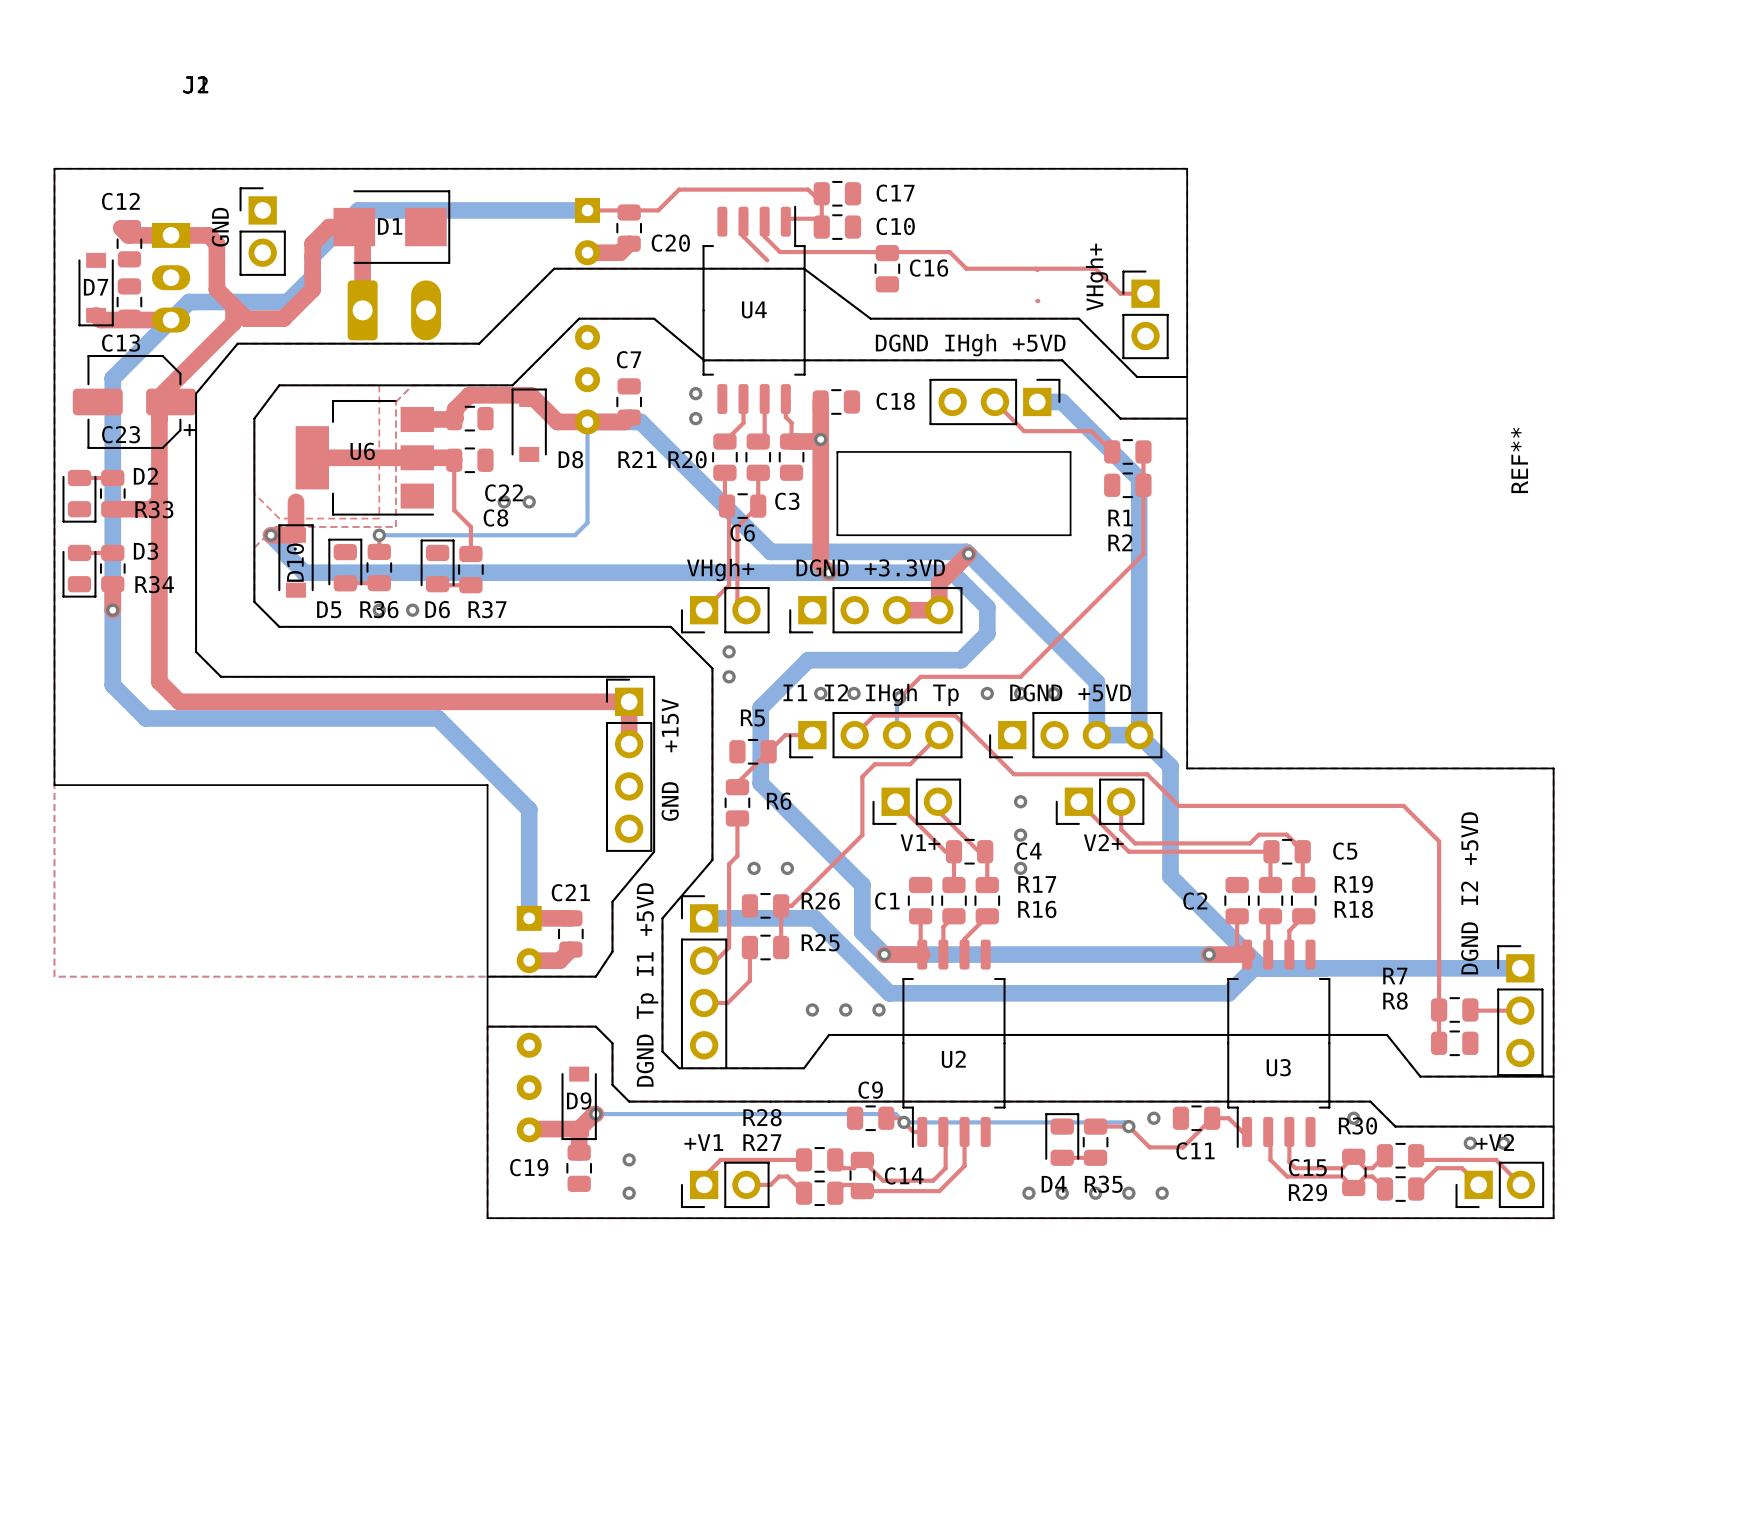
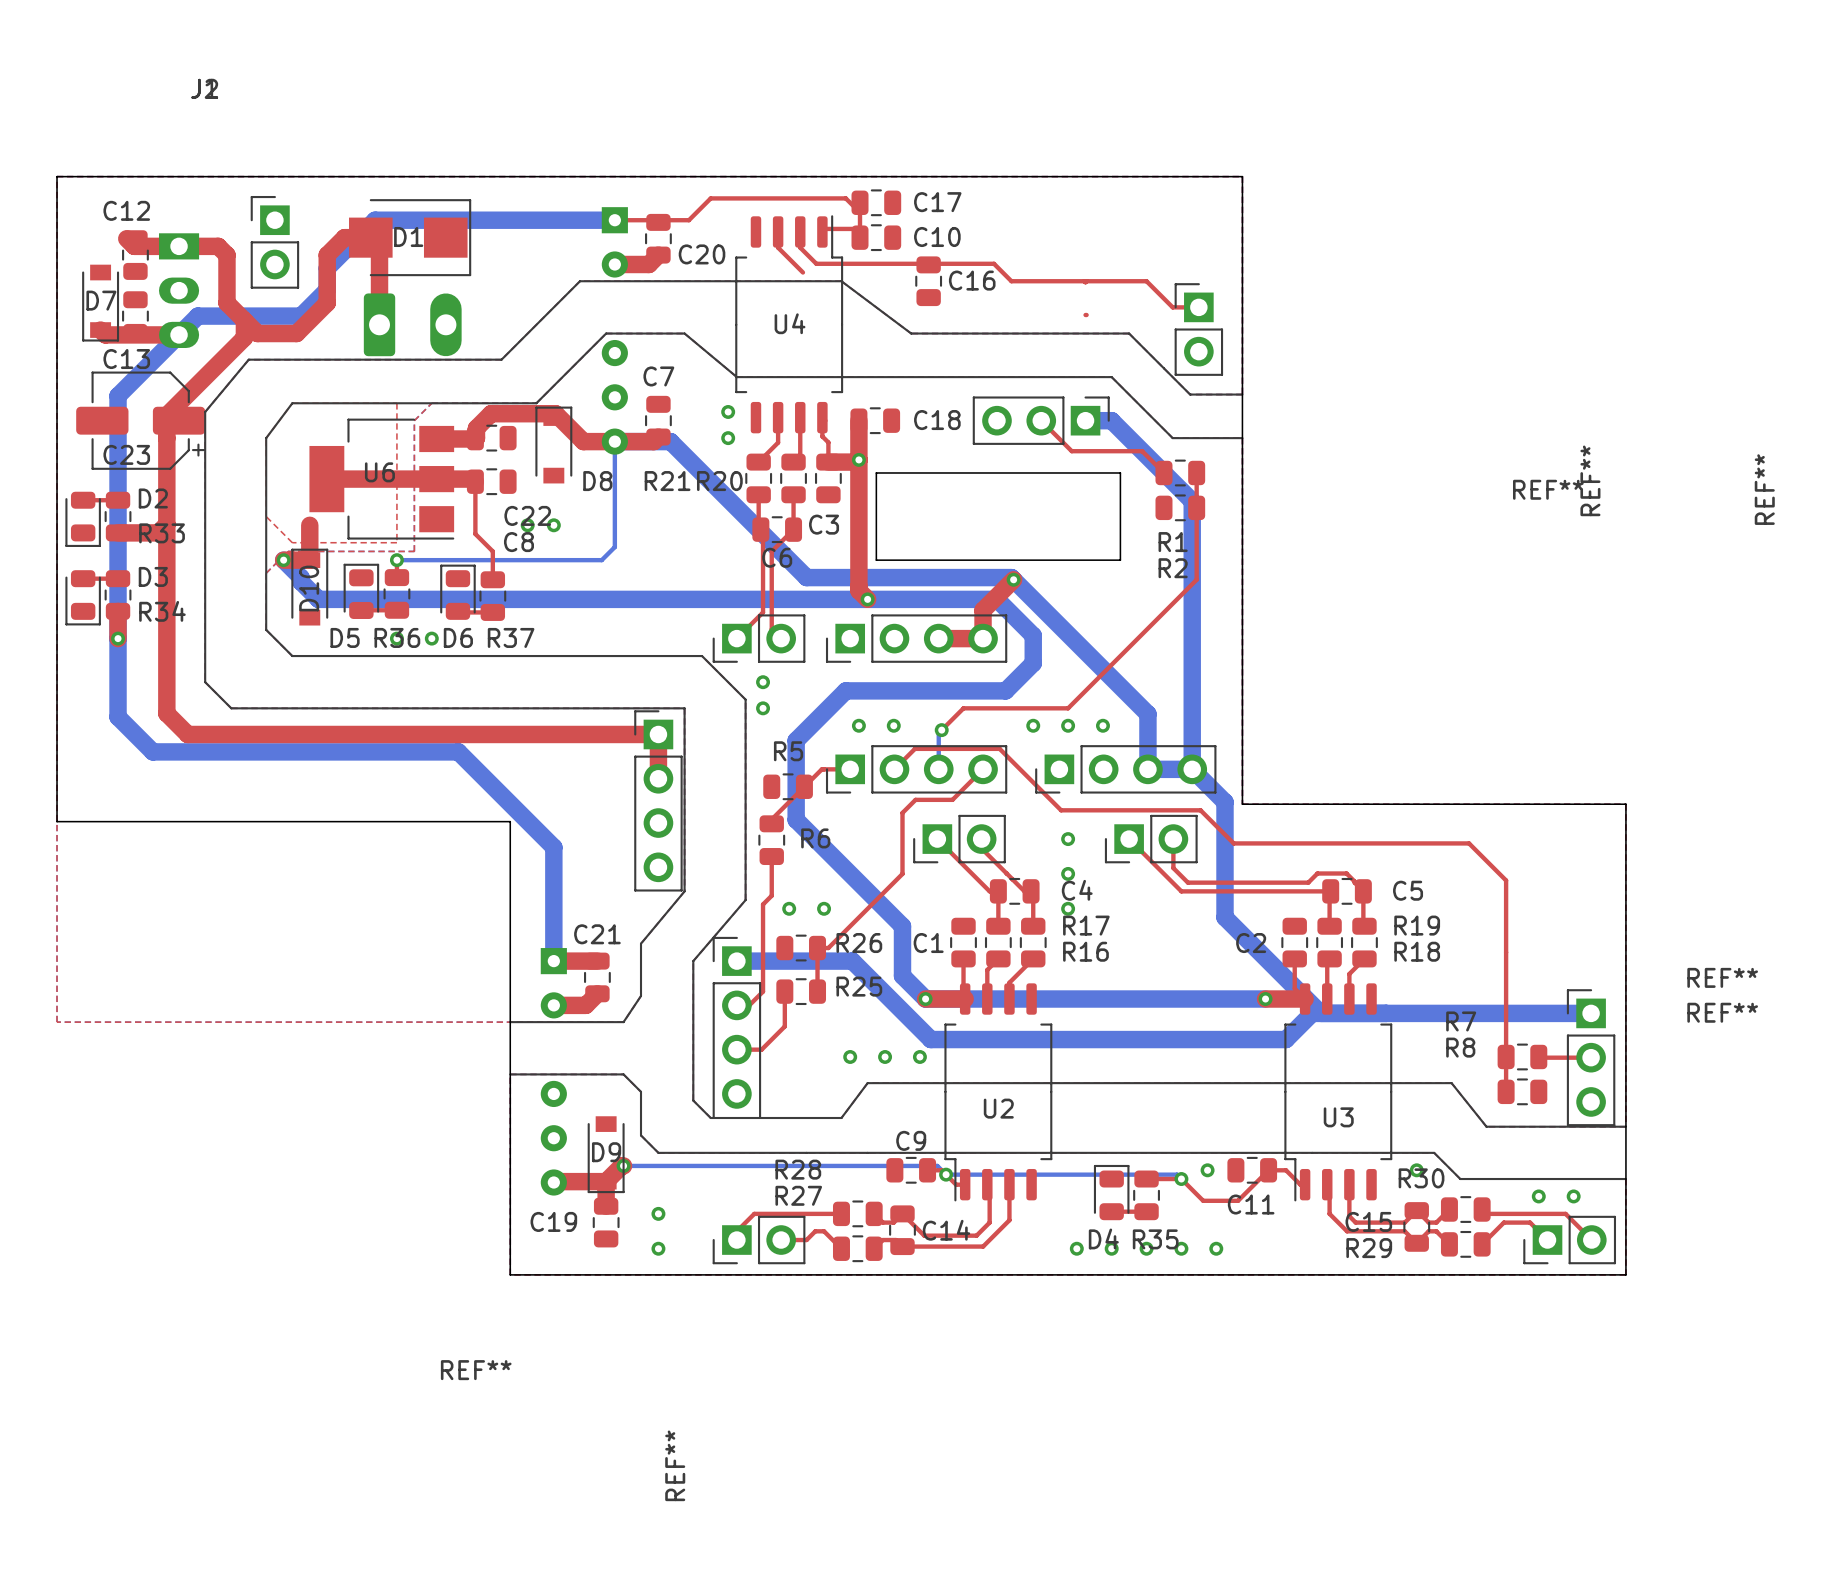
part footprint: [239, 187, 1545, 1209] -> [250, 195, 1617, 1265]
part text: DGND +3.3VD (870, 567) -> none
part text: VHgh+ (720, 570) -> none
part text: DGND +5VD (1070, 692) -> none
part text: I1 I2 IHgh Tp (871, 694) -> none
part text: GND +15V (670, 759) -> none
part text: V1+ (920, 842) -> none
part text: V2+ (1103, 842) -> none

